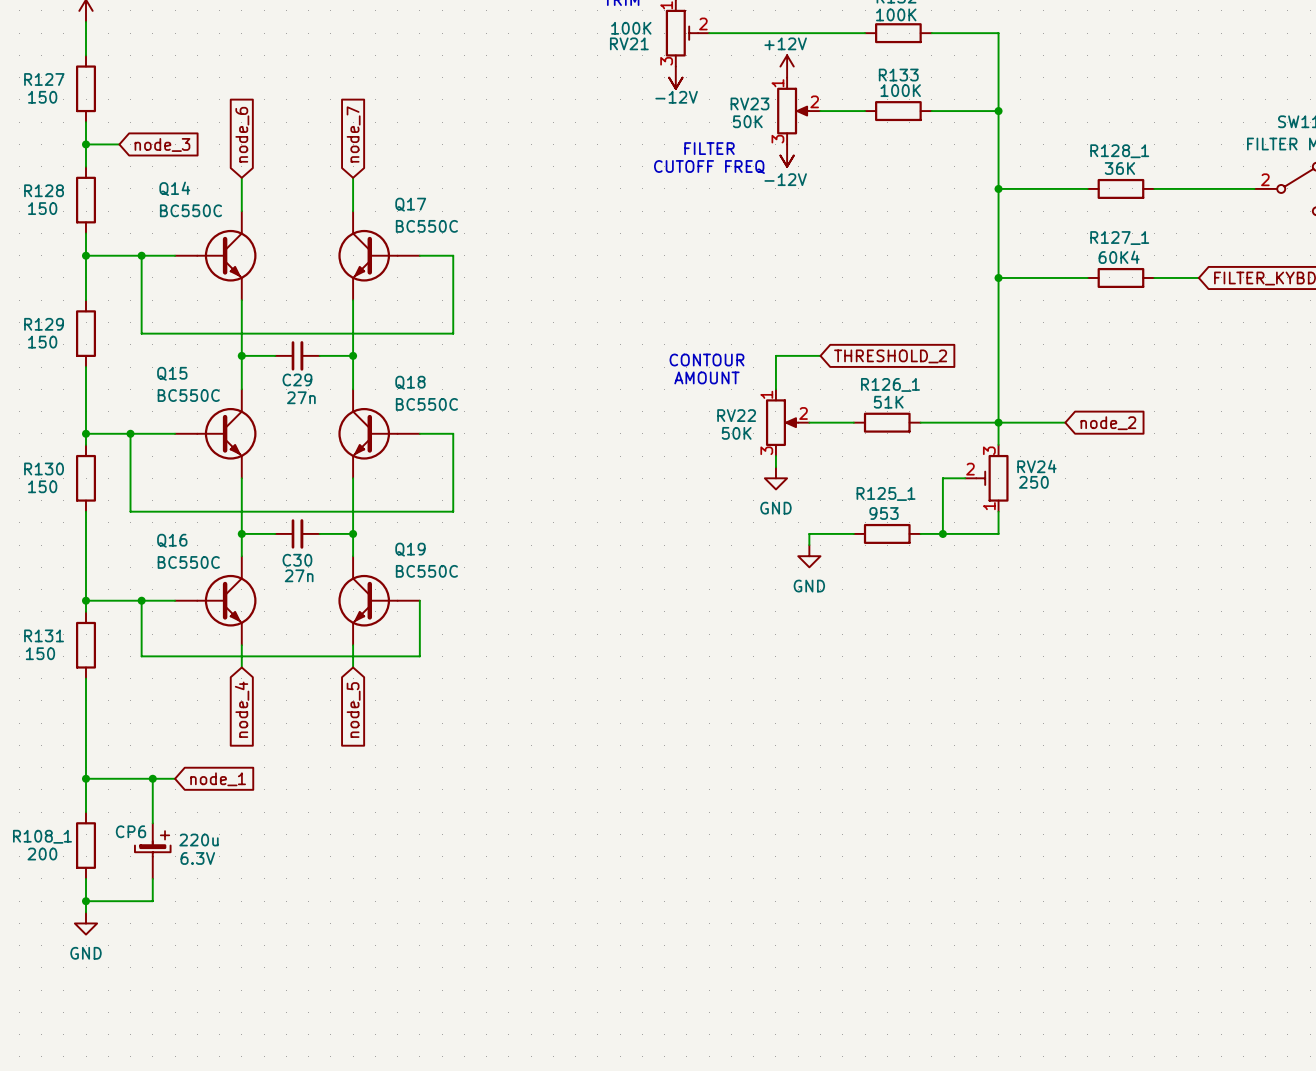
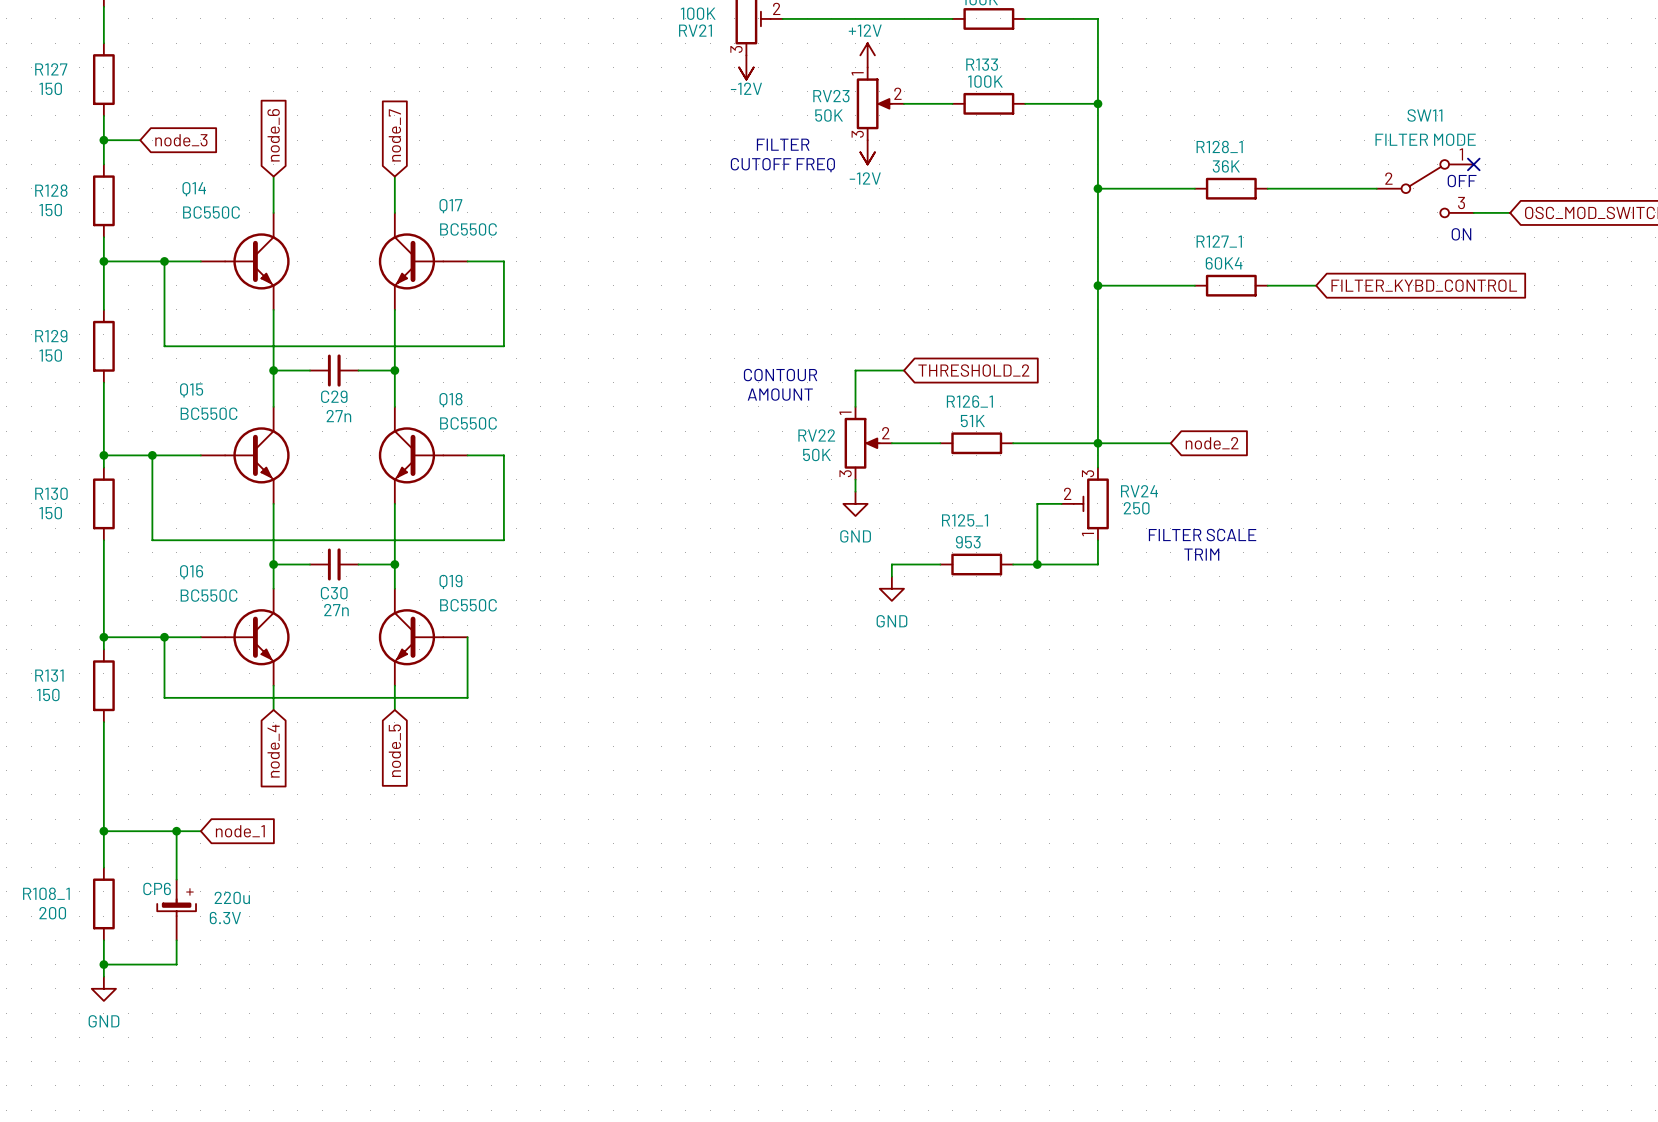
text: none -> FILTER SCALE (1202, 535)
text: none -> TRIM (1201, 554)

